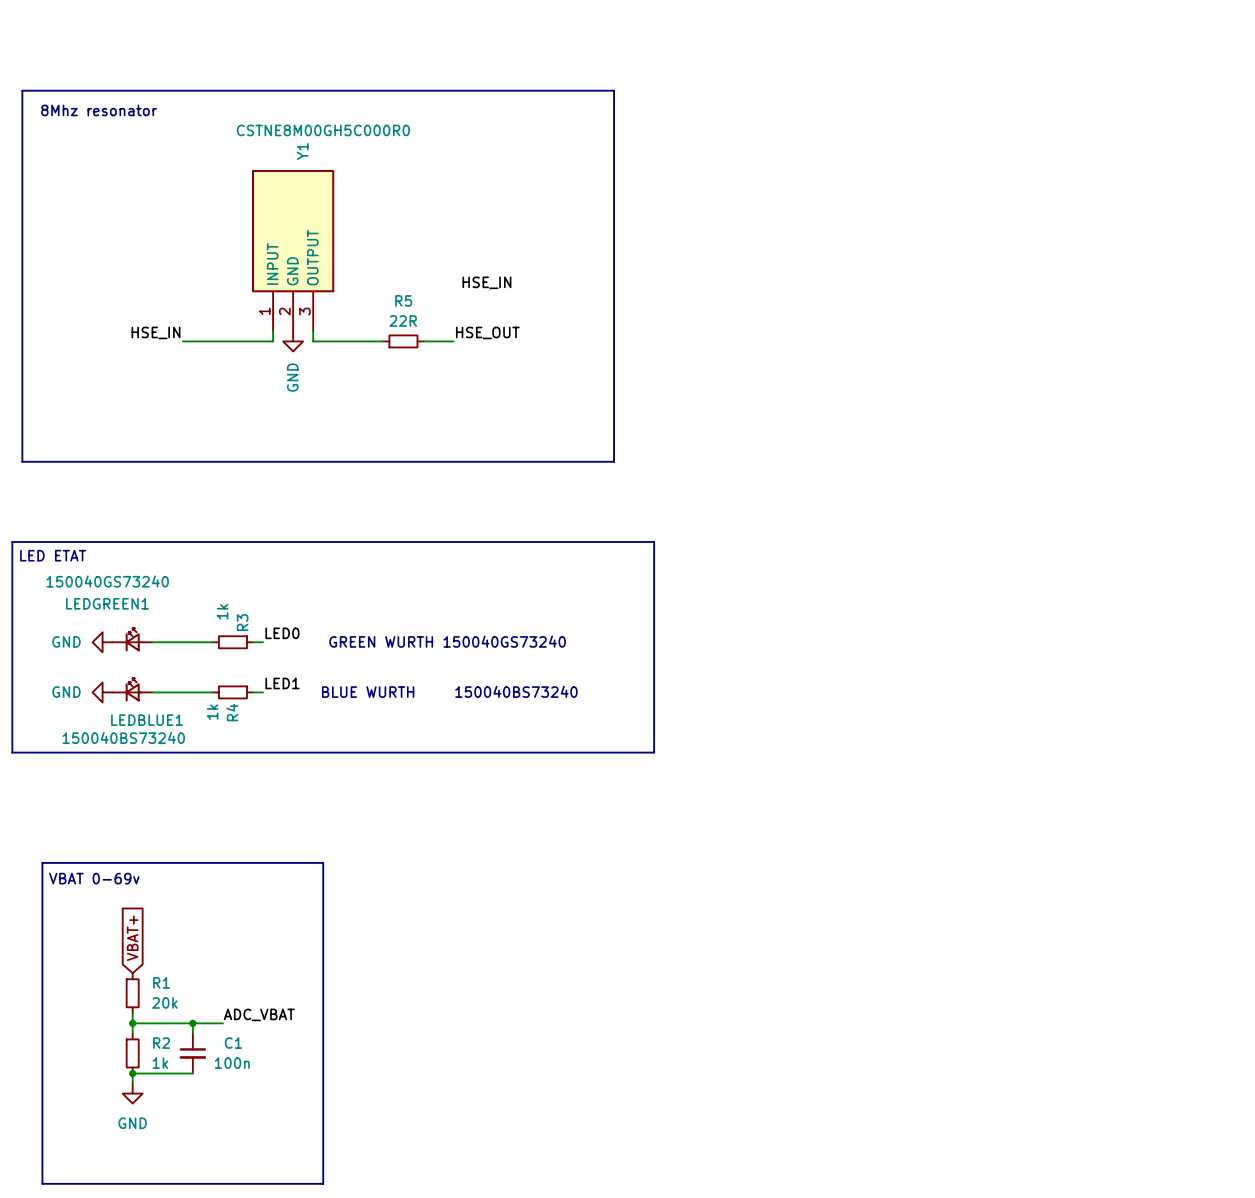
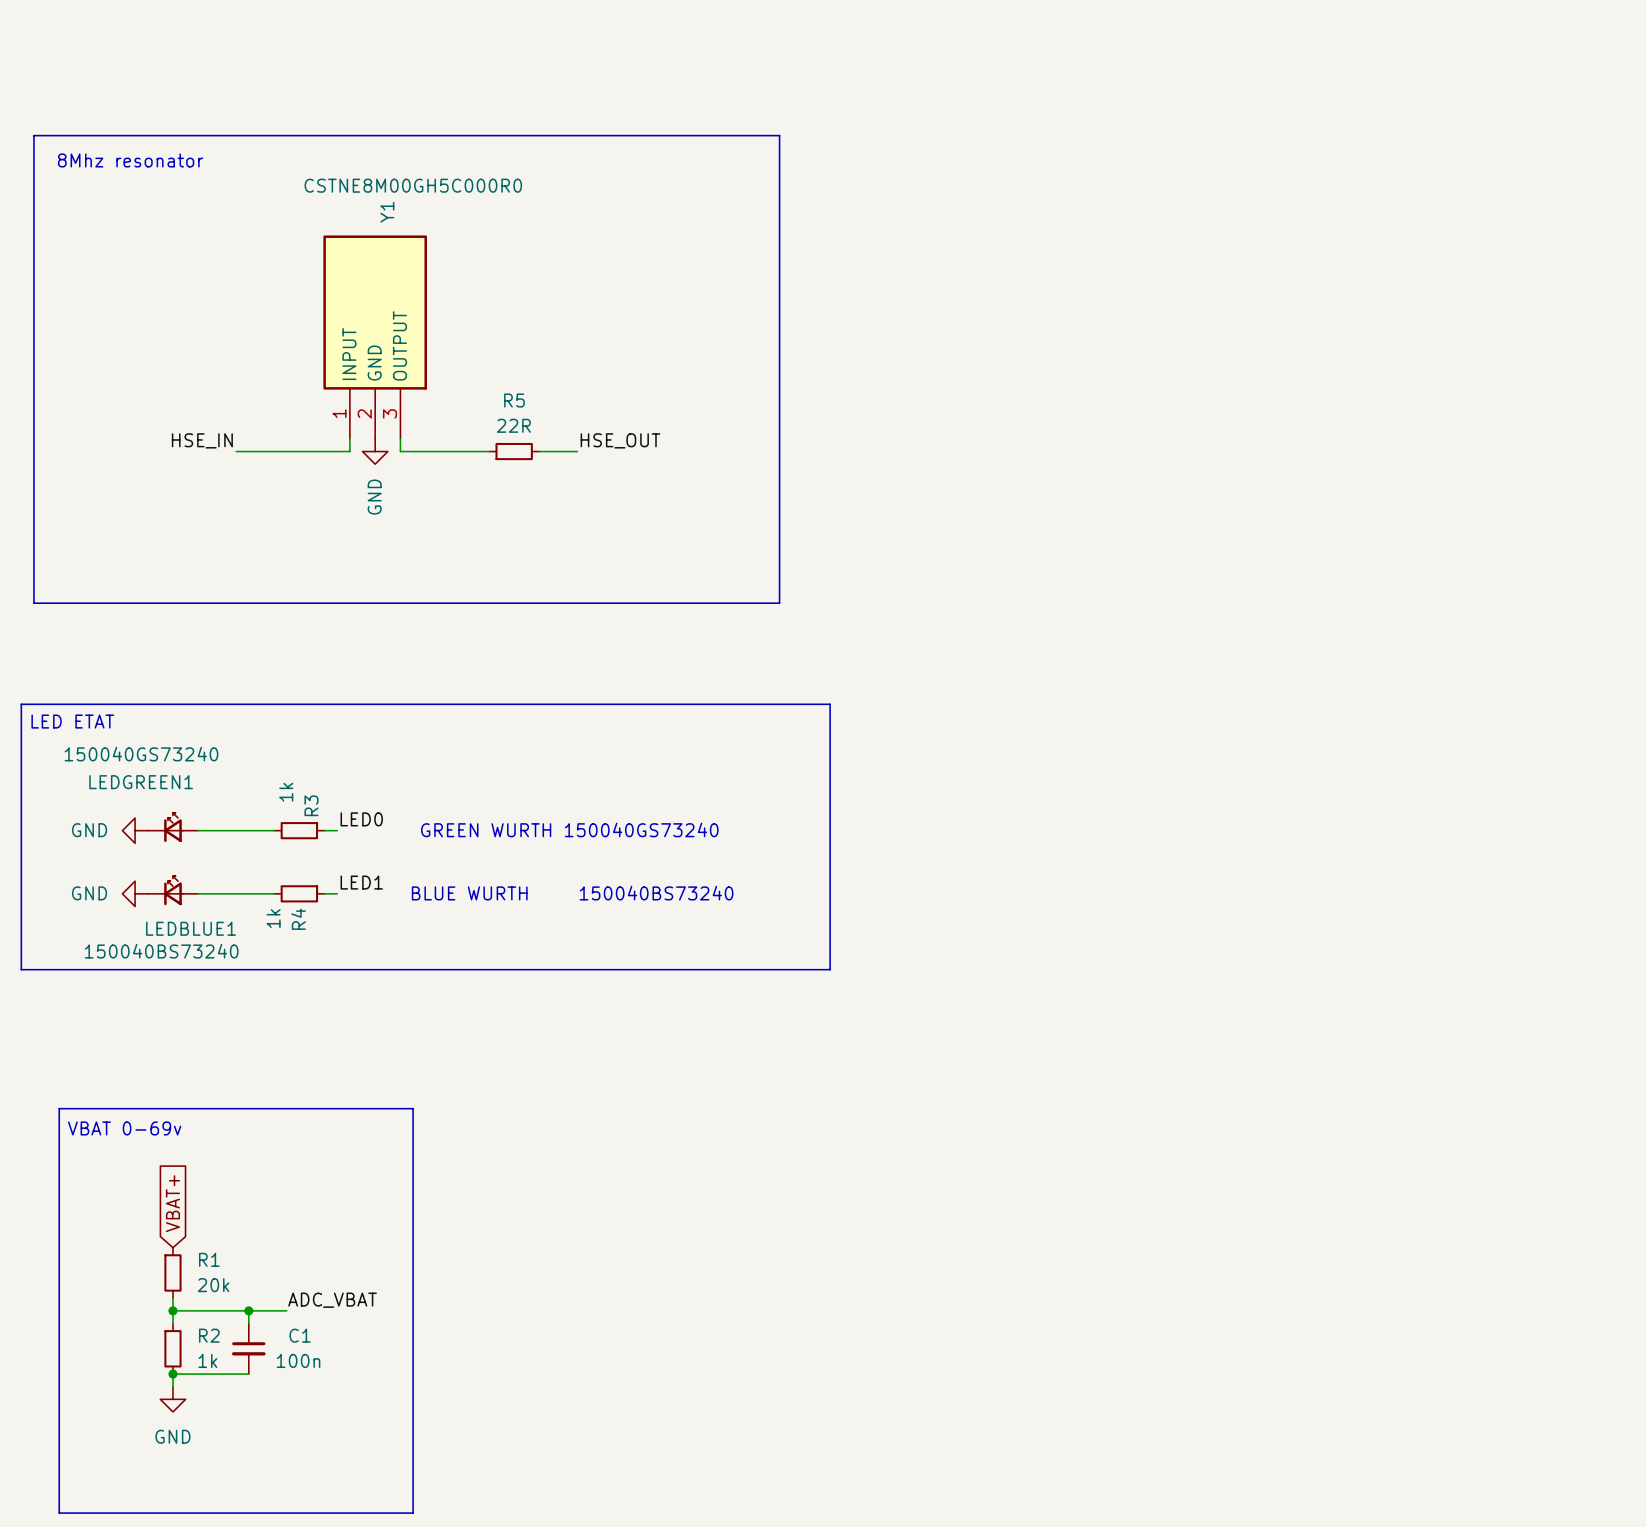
label: HSE_IN (486, 282) -> none

